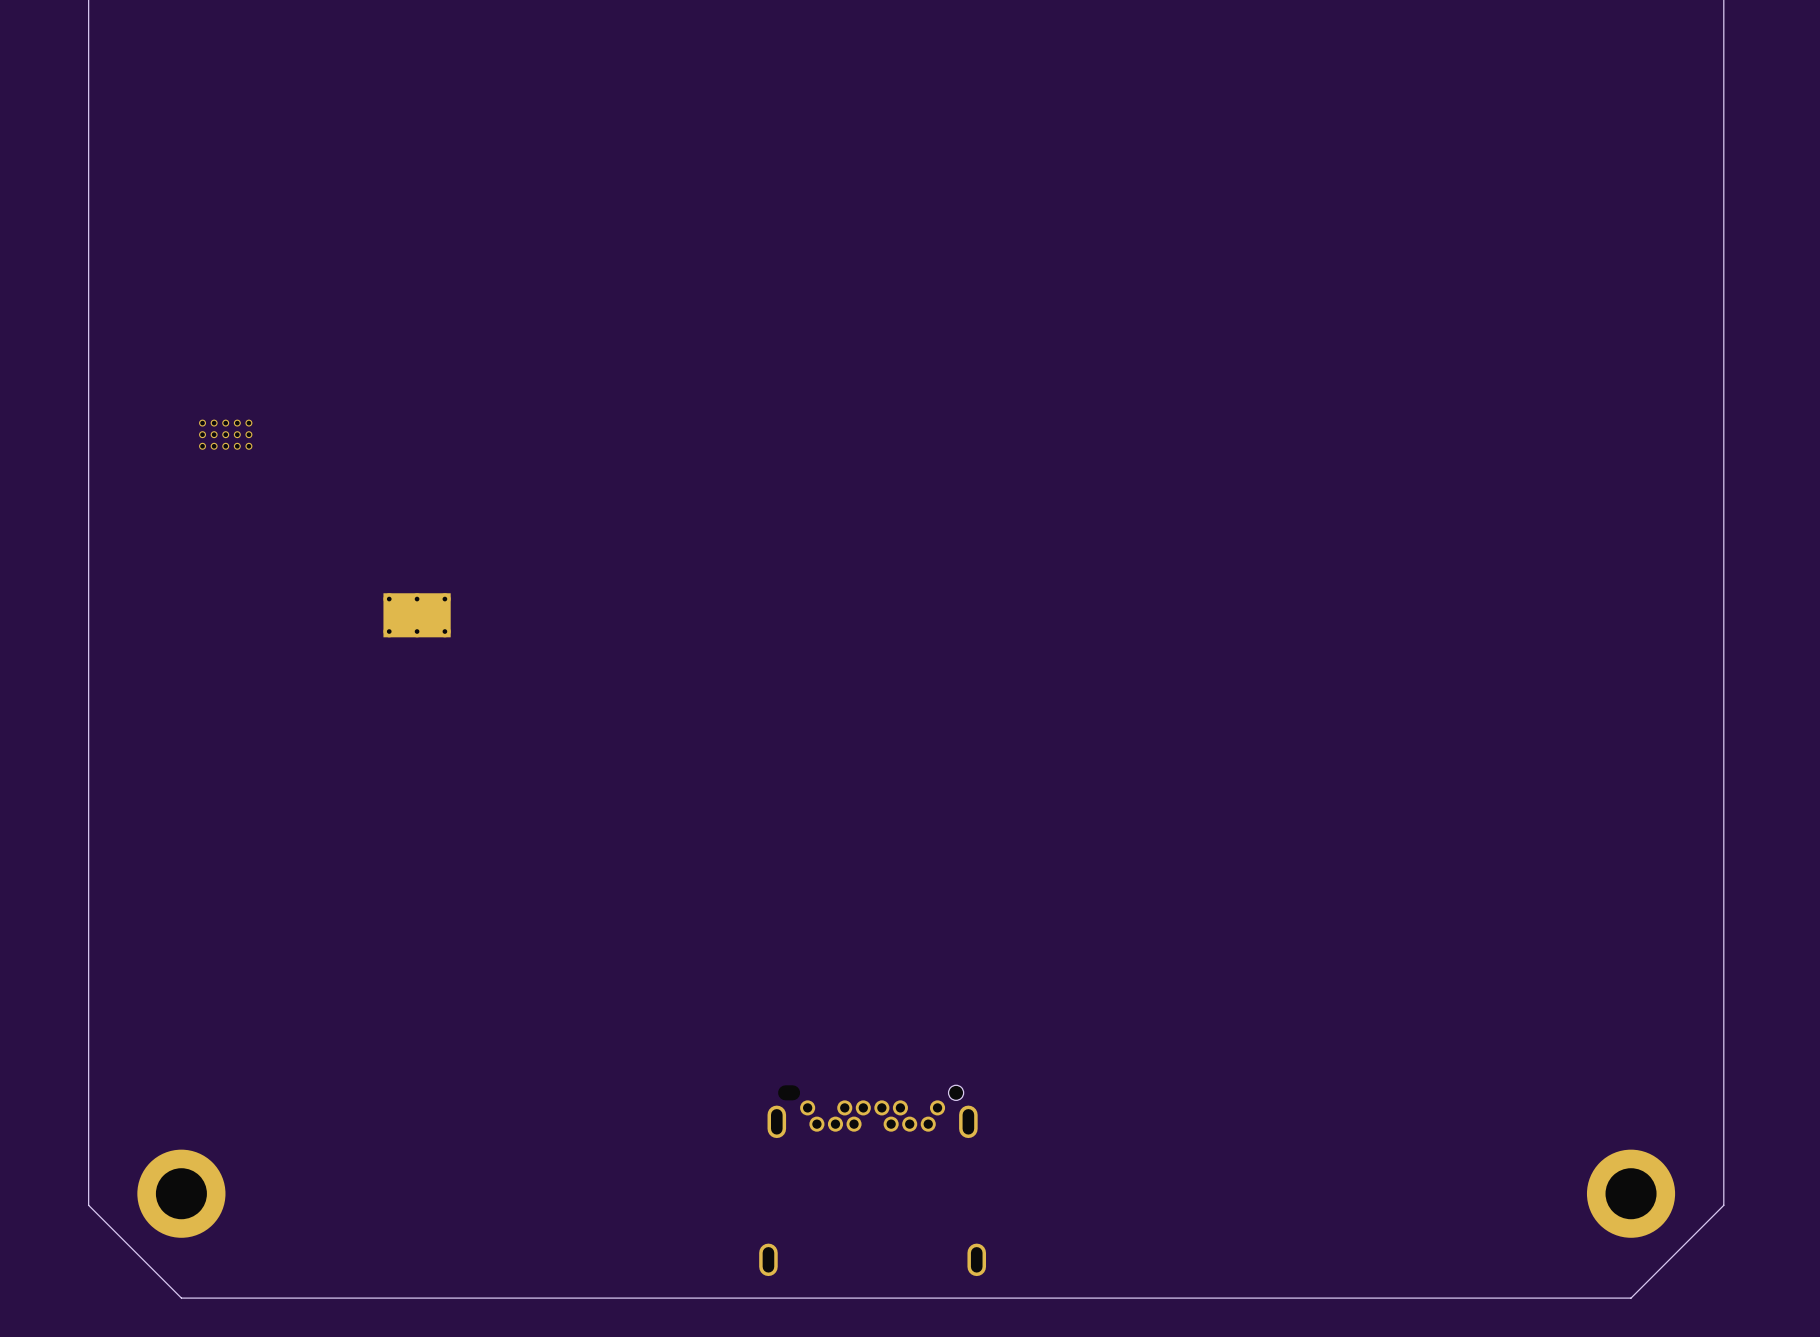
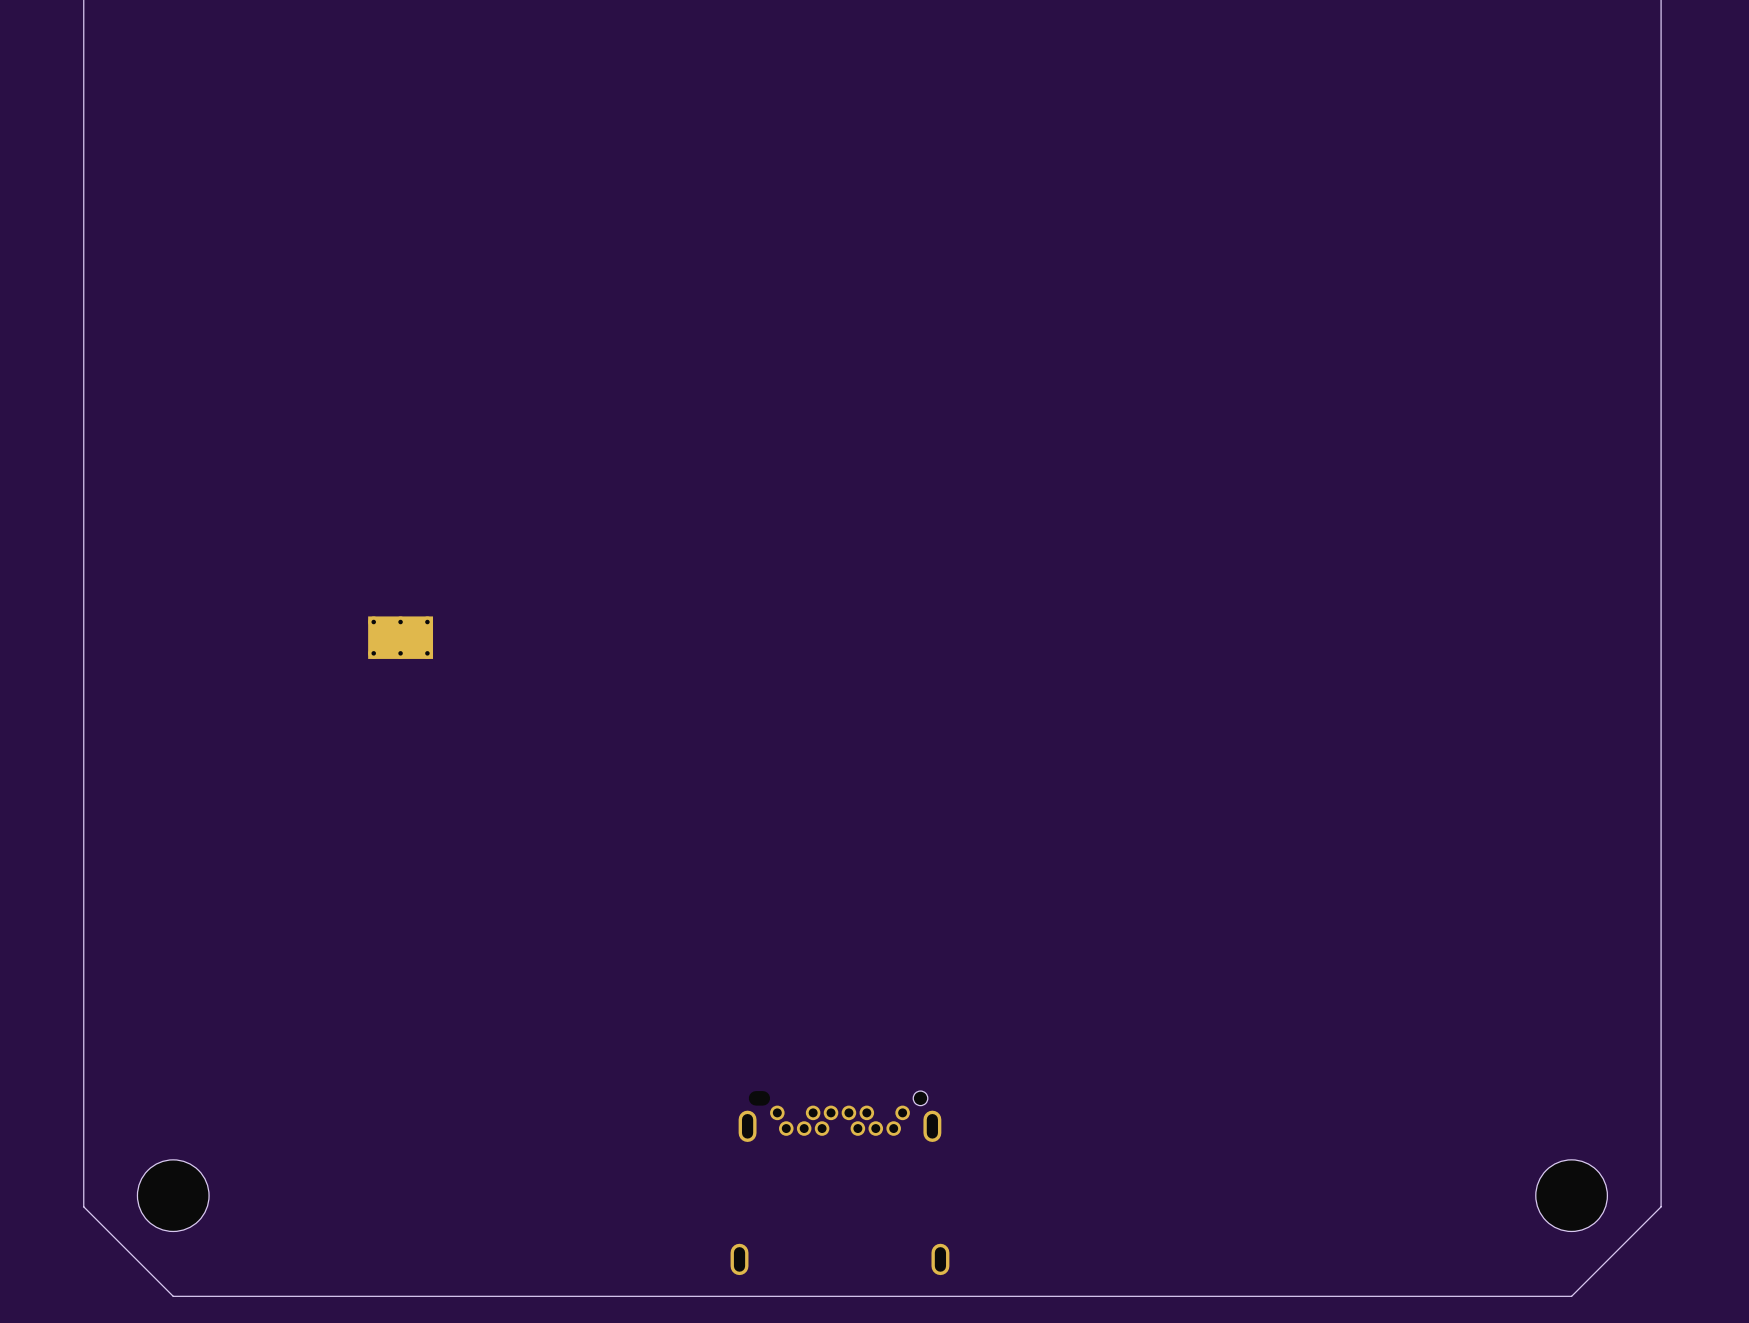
part: (225, 434) -> none
part footprint: [137, 1149, 226, 1238] -> [137, 1159, 210, 1232]
part footprint: [1586, 1149, 1676, 1238] -> [1535, 1159, 1608, 1232]

